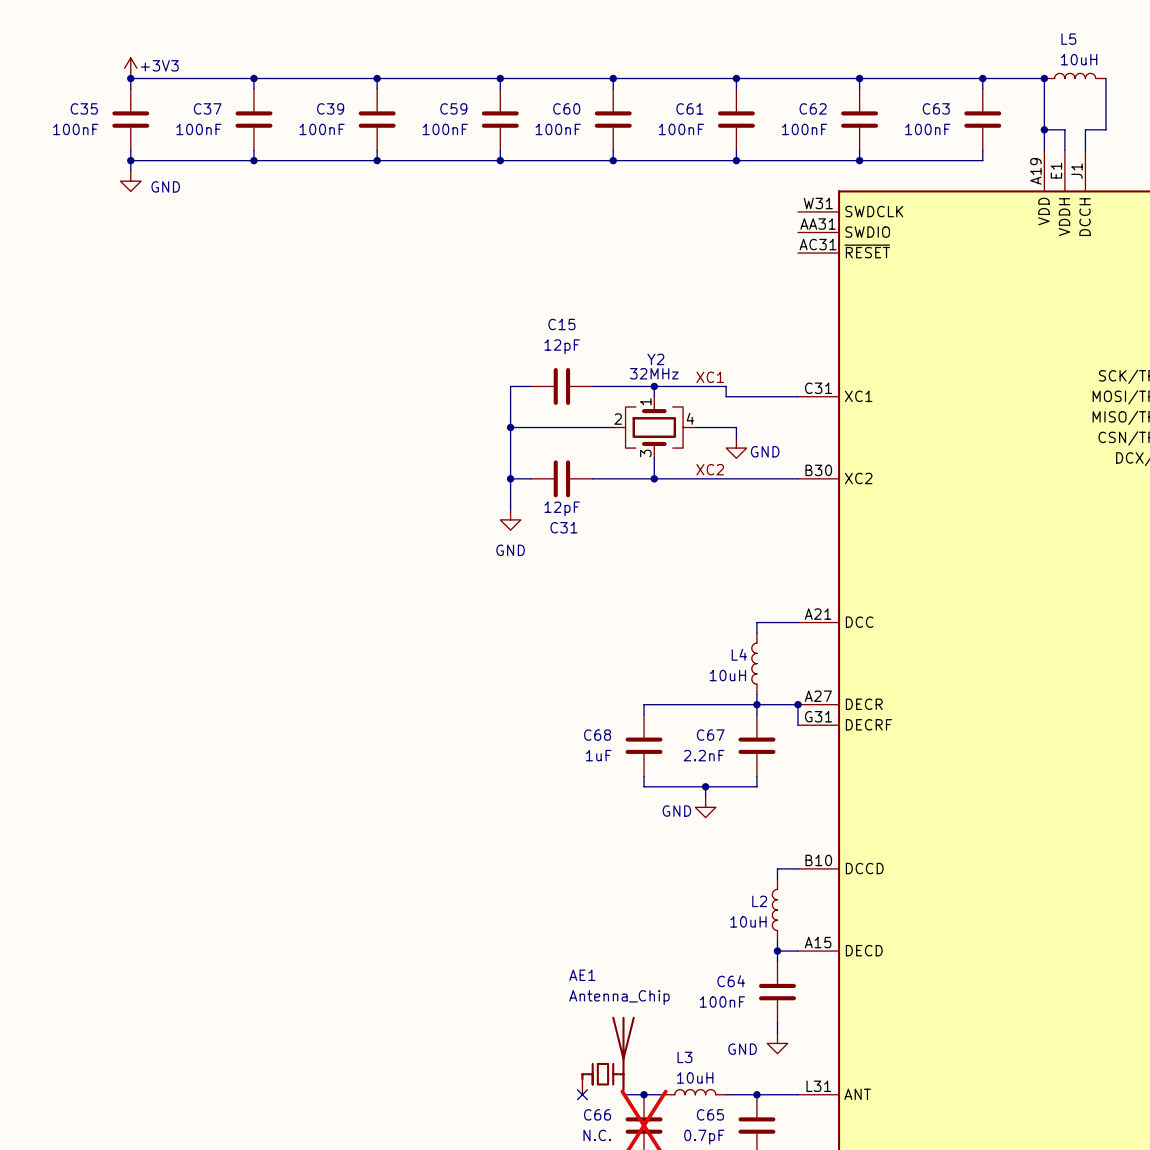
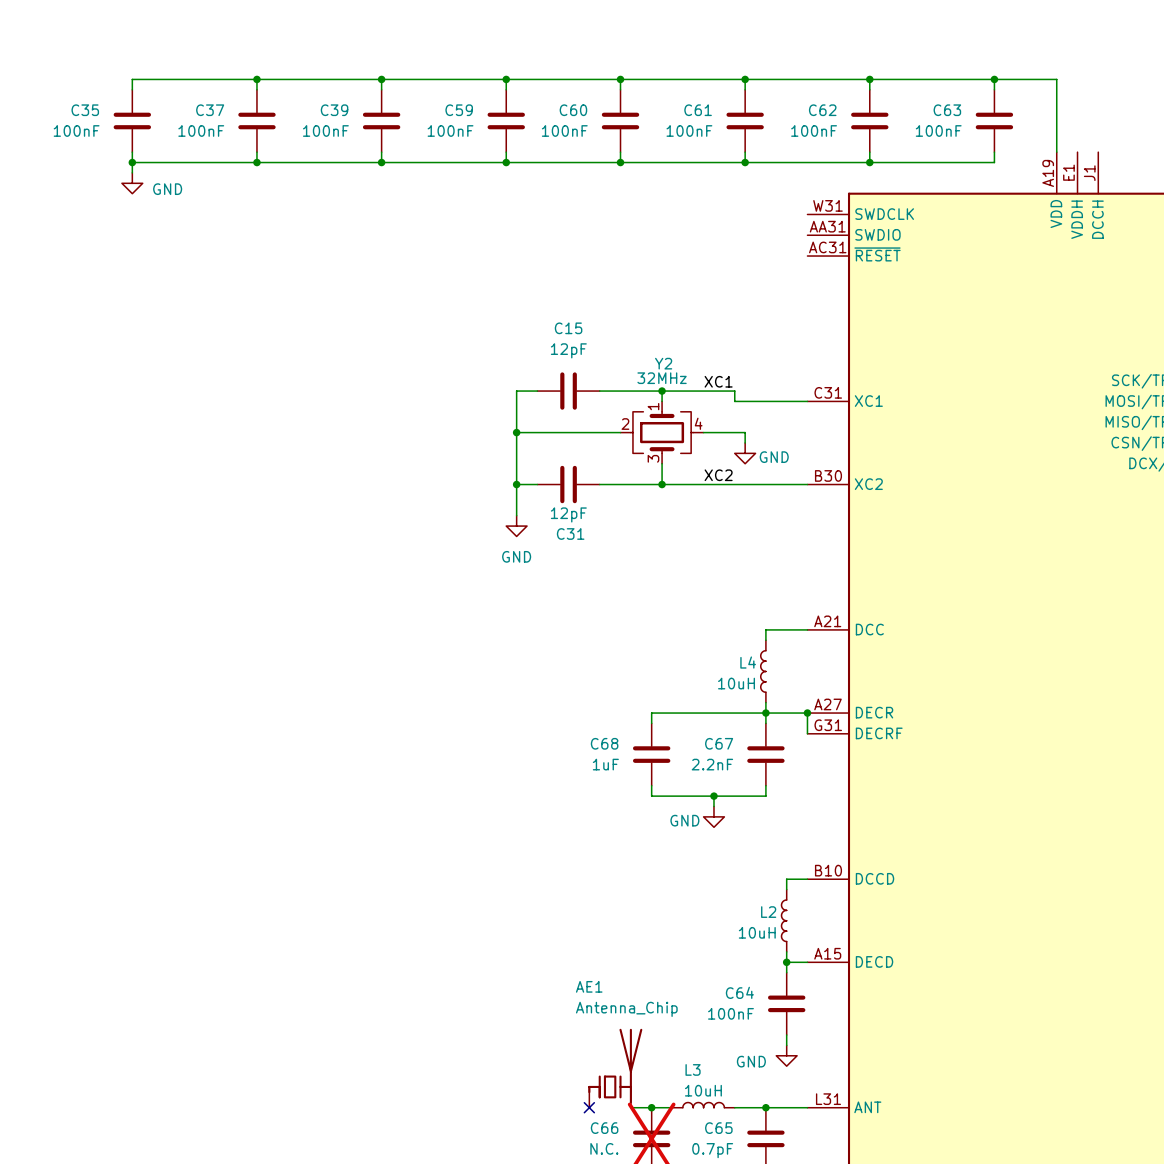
power symbol: +3V3 (130, 68) -> none
L5: 10uH (1075, 75) -> none
junction: (130, 78) -> none
junction: (1044, 78) -> none
wire: (1105, 78) (1105, 129) (1085, 129) (1085, 150) -> none
wire: (1044, 129) (1064, 129) (1064, 150) -> none
junction: (1044, 129) -> none

